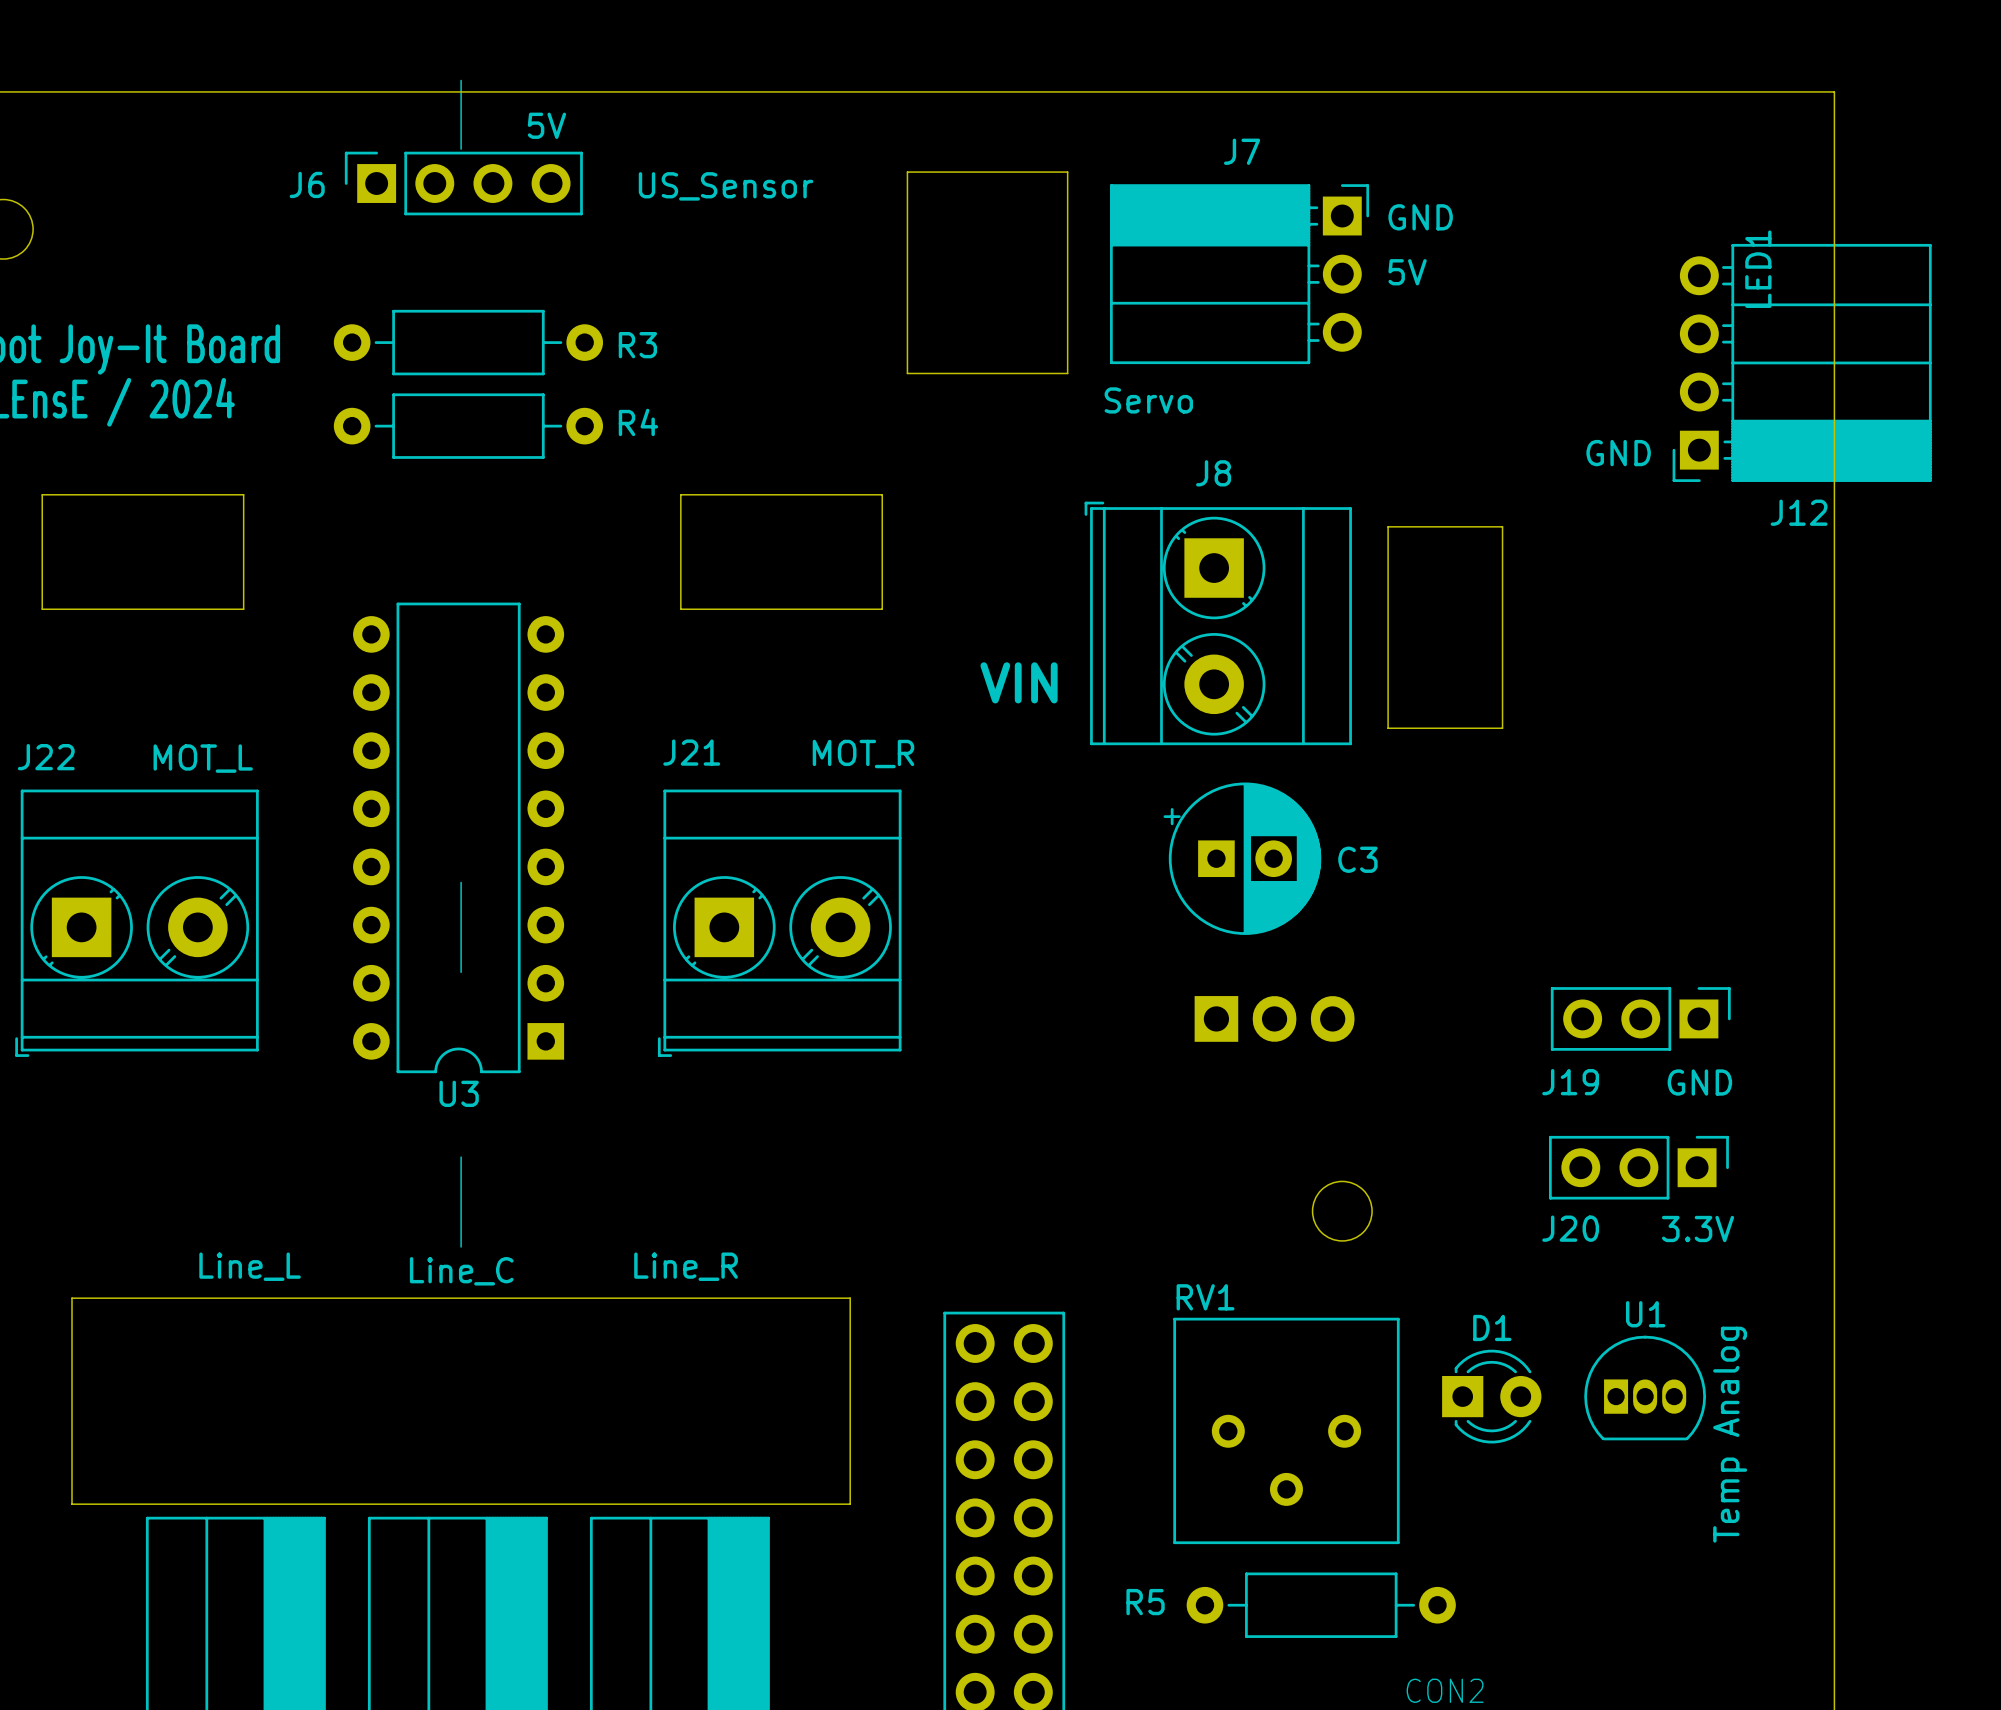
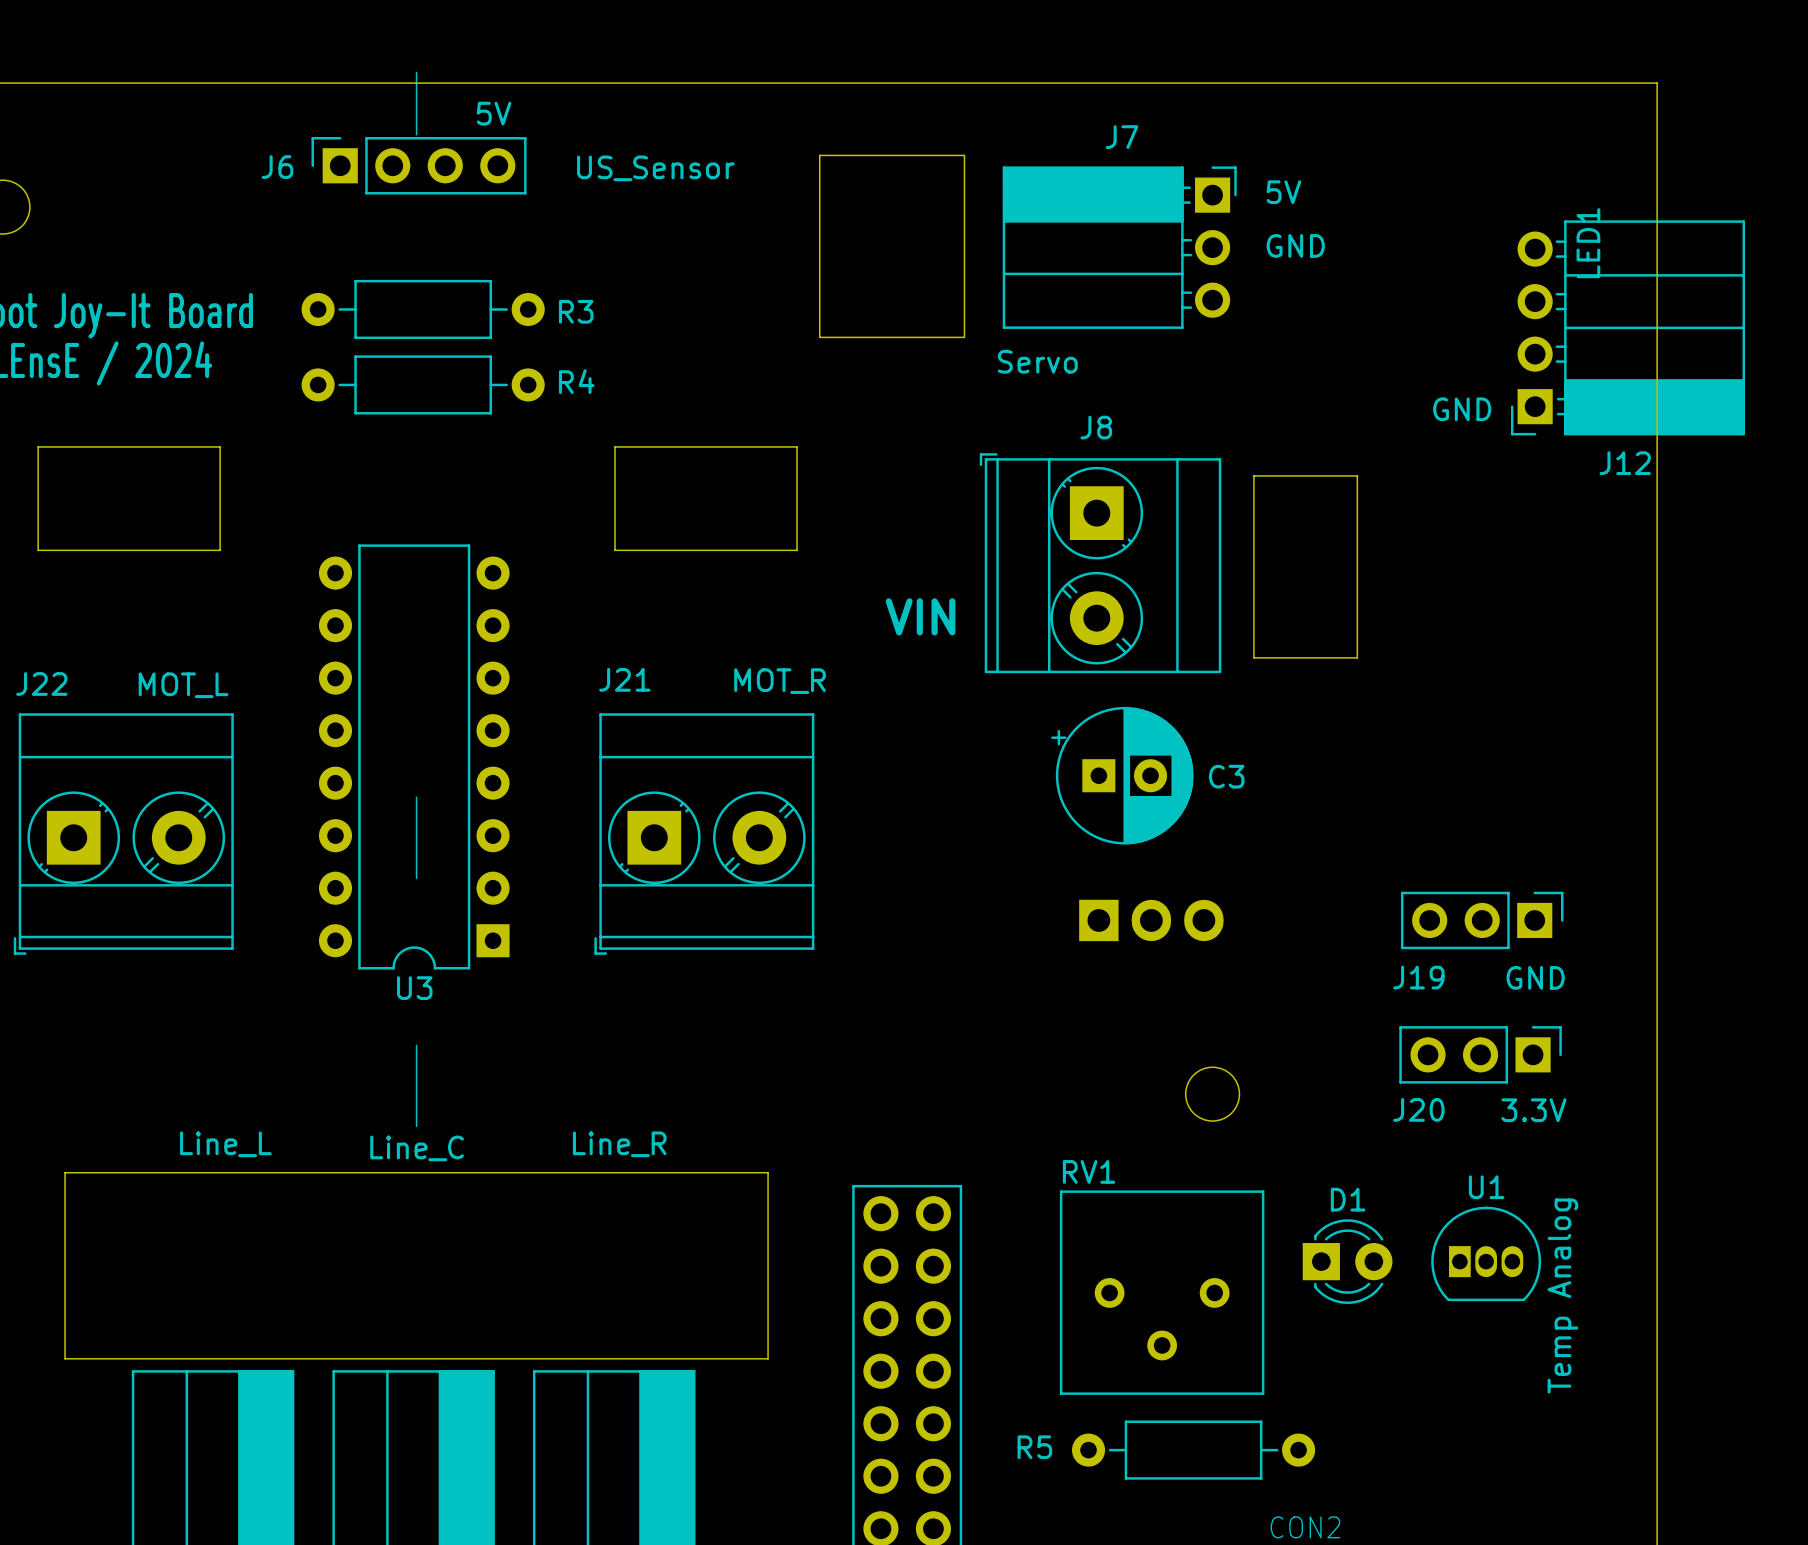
text position: GND (1420, 217) -> GND (1295, 245)
text position: 5V (1407, 272) -> 5V (1283, 192)

